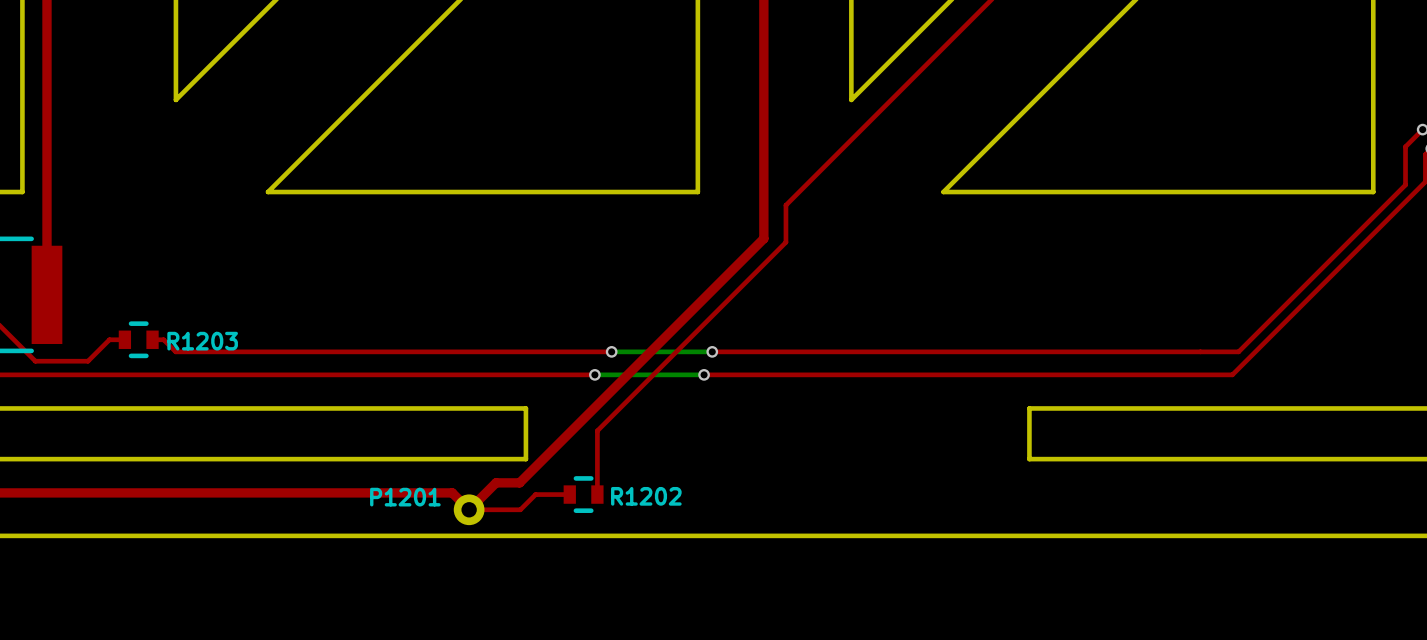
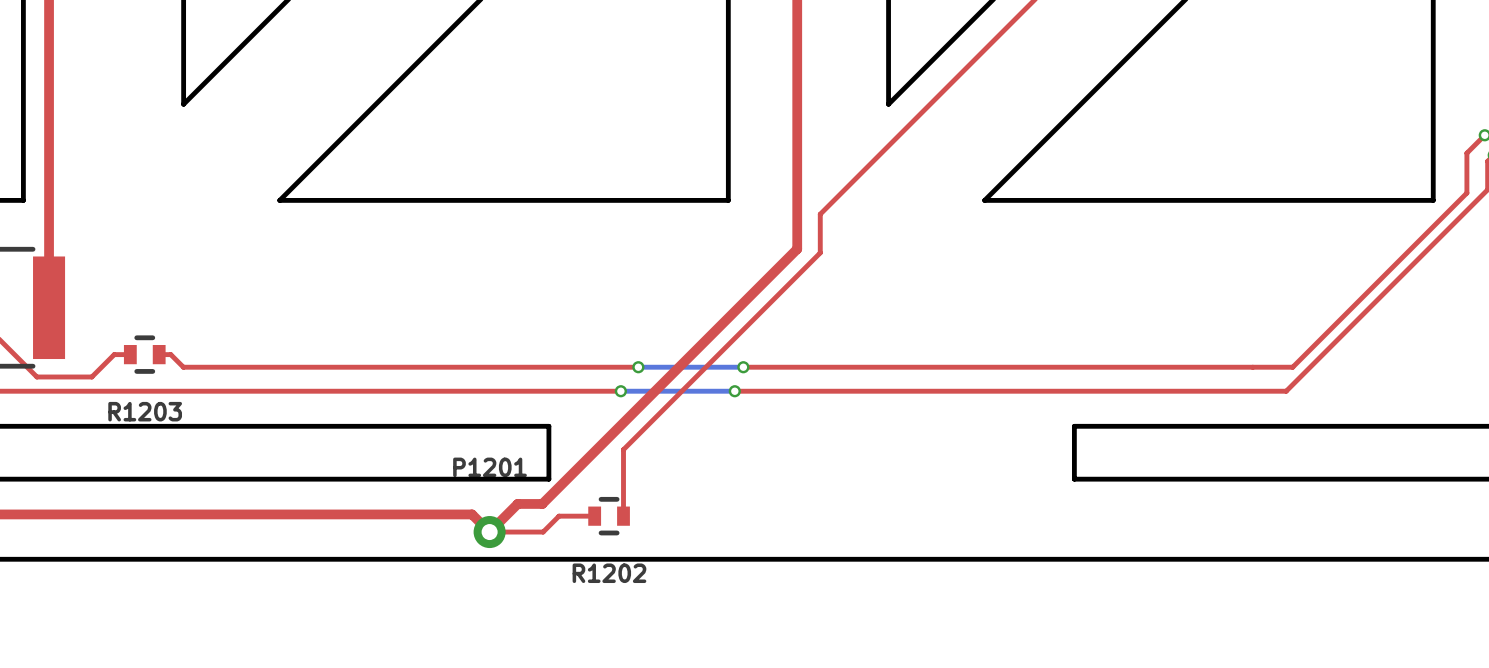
R1203 name position: R1203 (202, 341) -> R1203 (145, 411)
R1202 name position: R1202 (646, 496) -> R1202 (609, 573)
P1201 name position: P1201 (405, 497) -> P1201 (490, 467)

